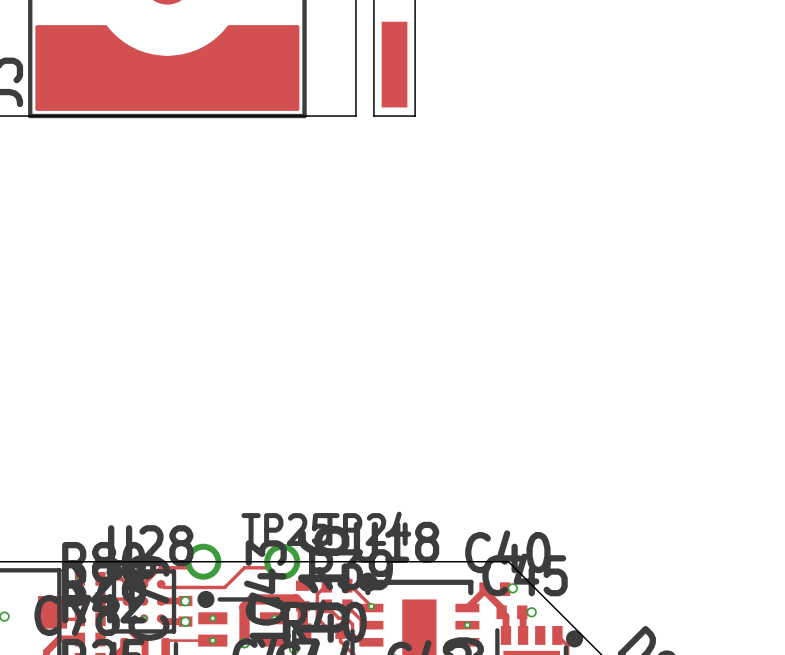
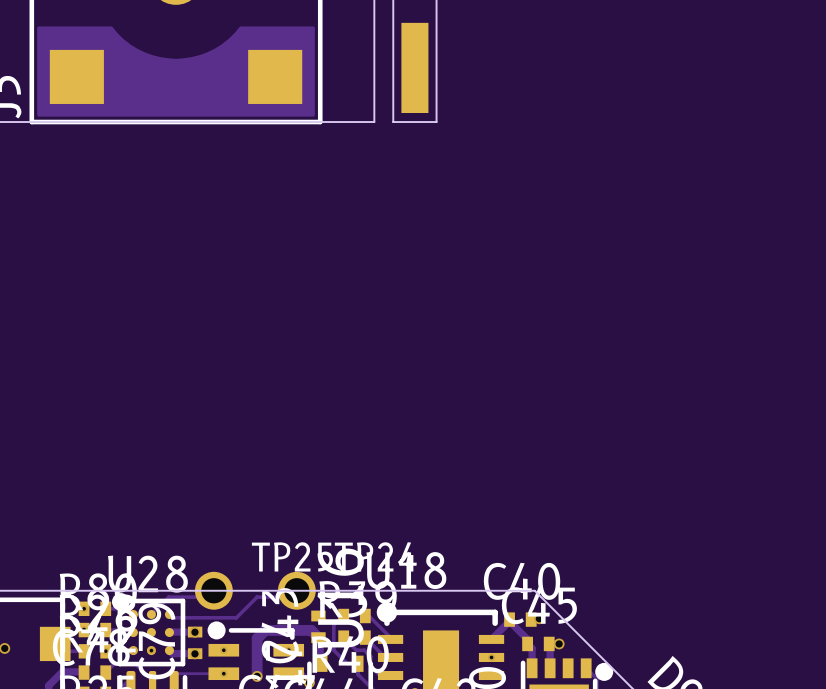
via: (371, 606) -> none

